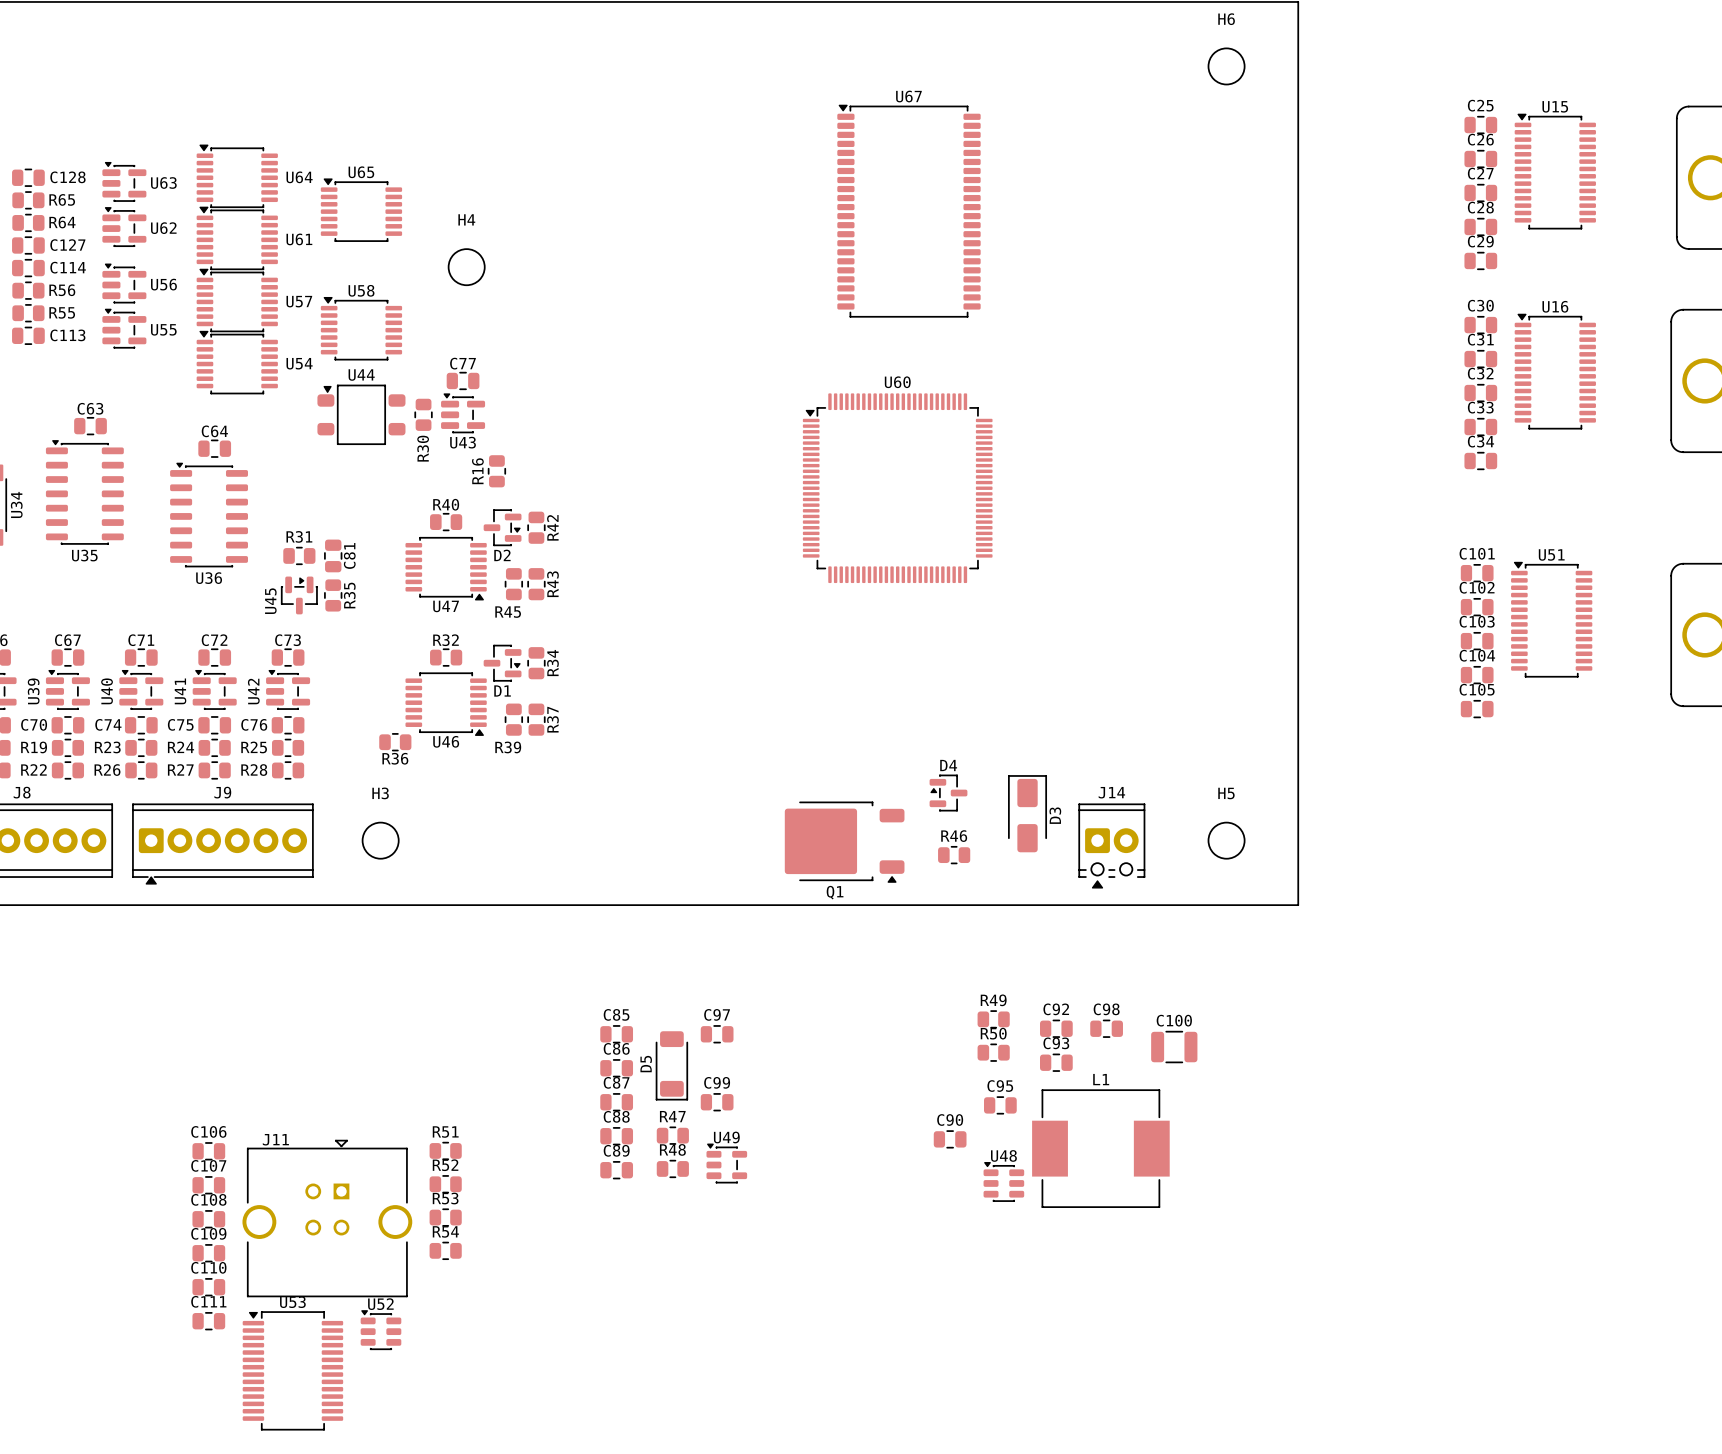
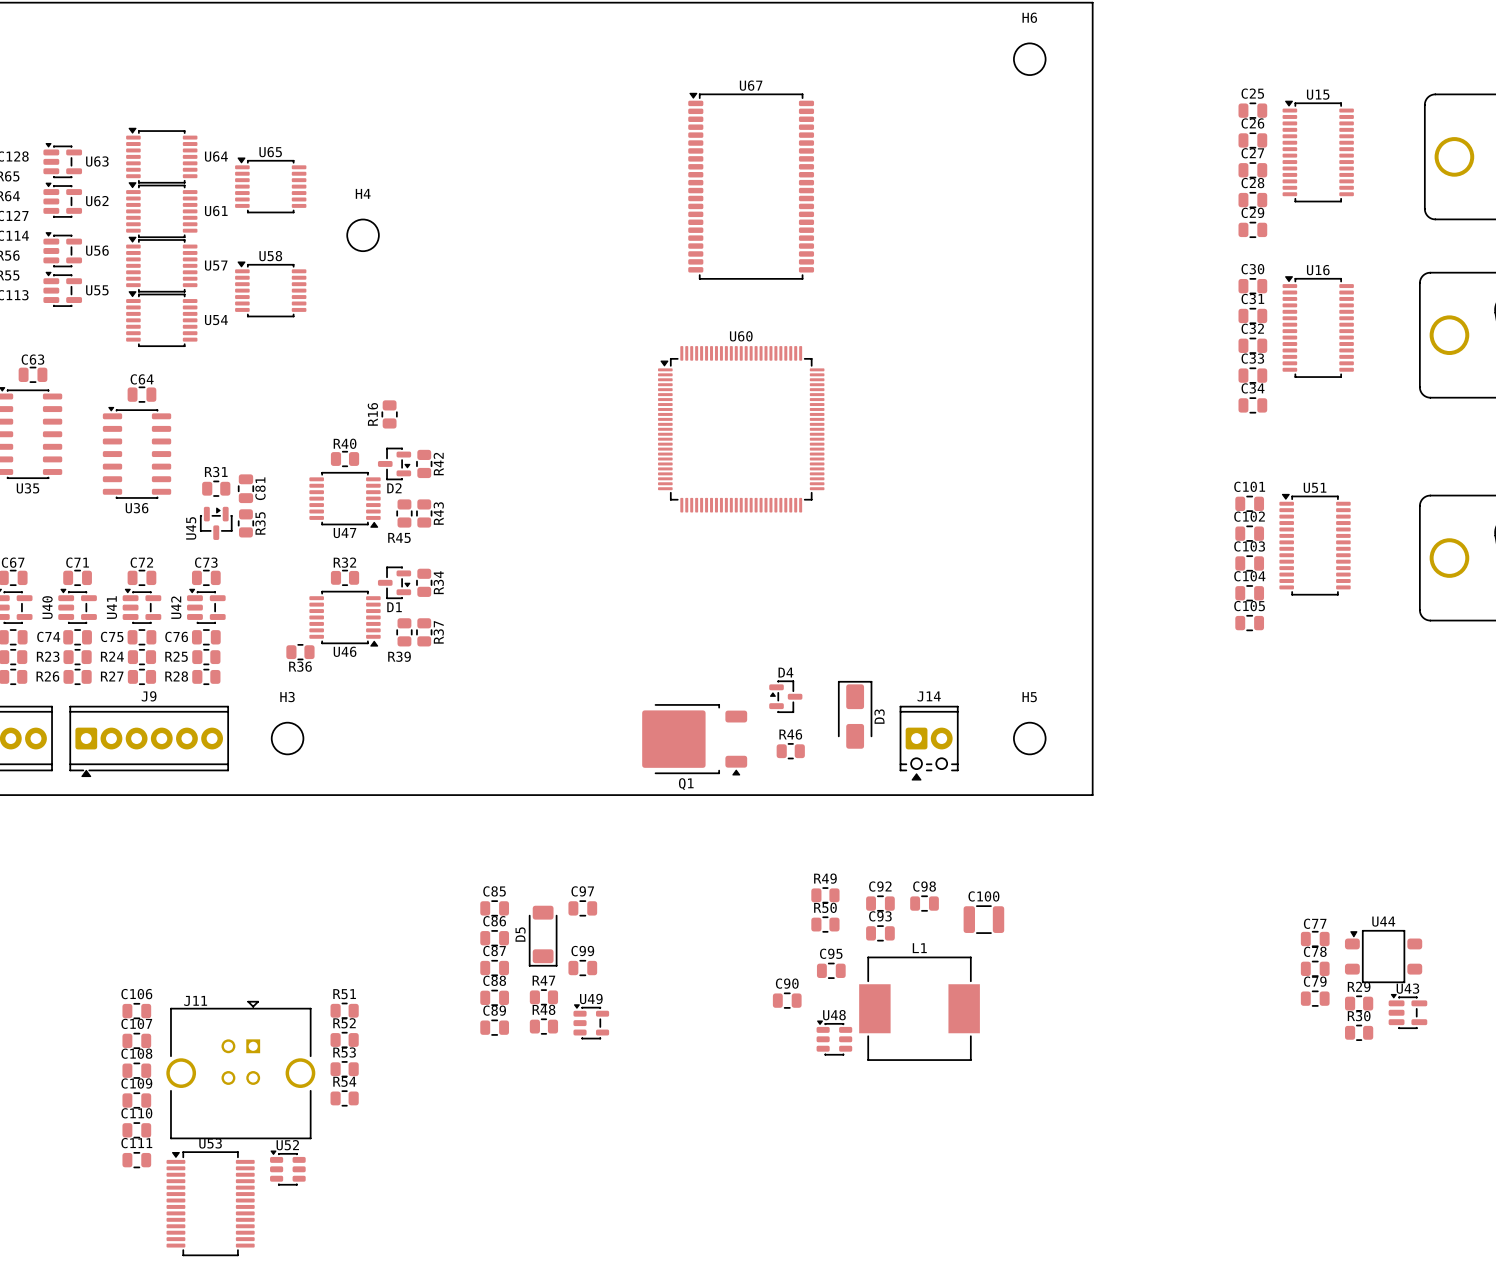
C77 position: (463, 380) -> (1315, 939)
U43 position: (463, 413) -> (1407, 1011)
U44 position: (361, 414) -> (1383, 956)
R30 rotation: 0° (423, 414) -> 90° clockwise (1359, 1032)
R30 position: (423, 414) -> (1359, 1032)
U43 name position: U43 (463, 442) -> U43 (1407, 988)
R30 name position: R30 (423, 448) -> R30 (1359, 1016)
C78: none -> (1315, 968)
C79: none -> (1315, 998)
R29: none -> (1359, 1003)

